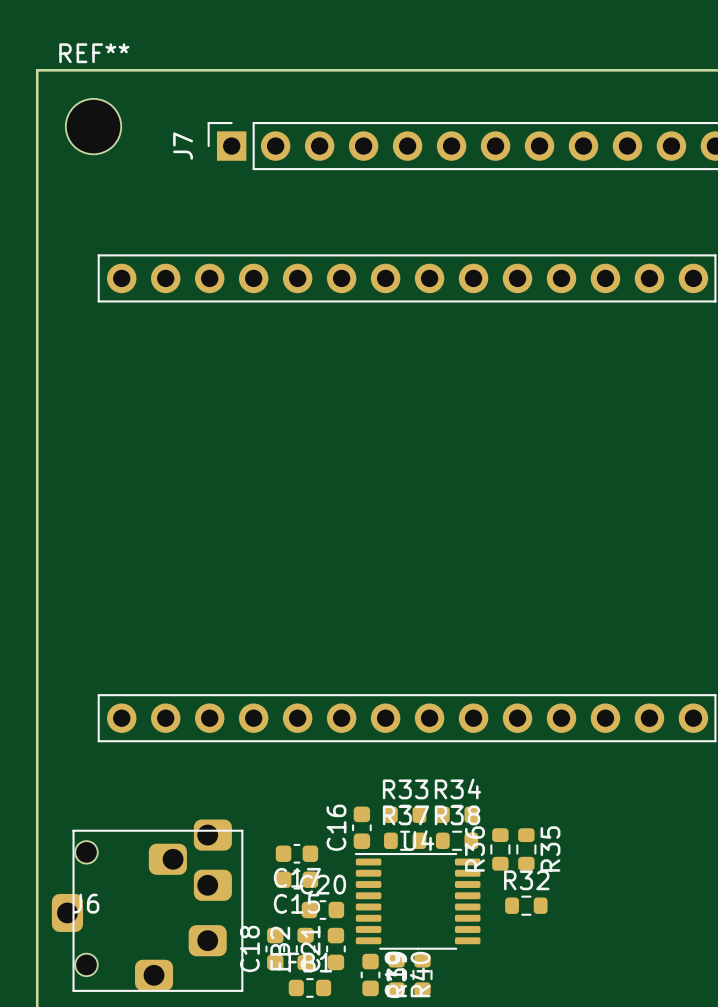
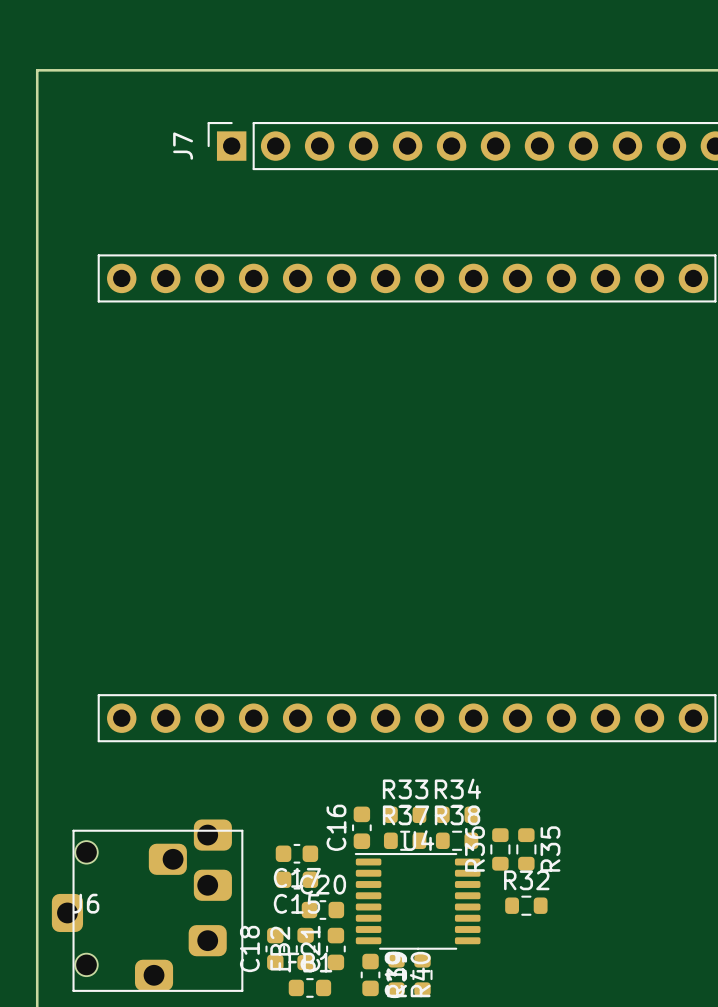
REF**: (93, 126) -> none

